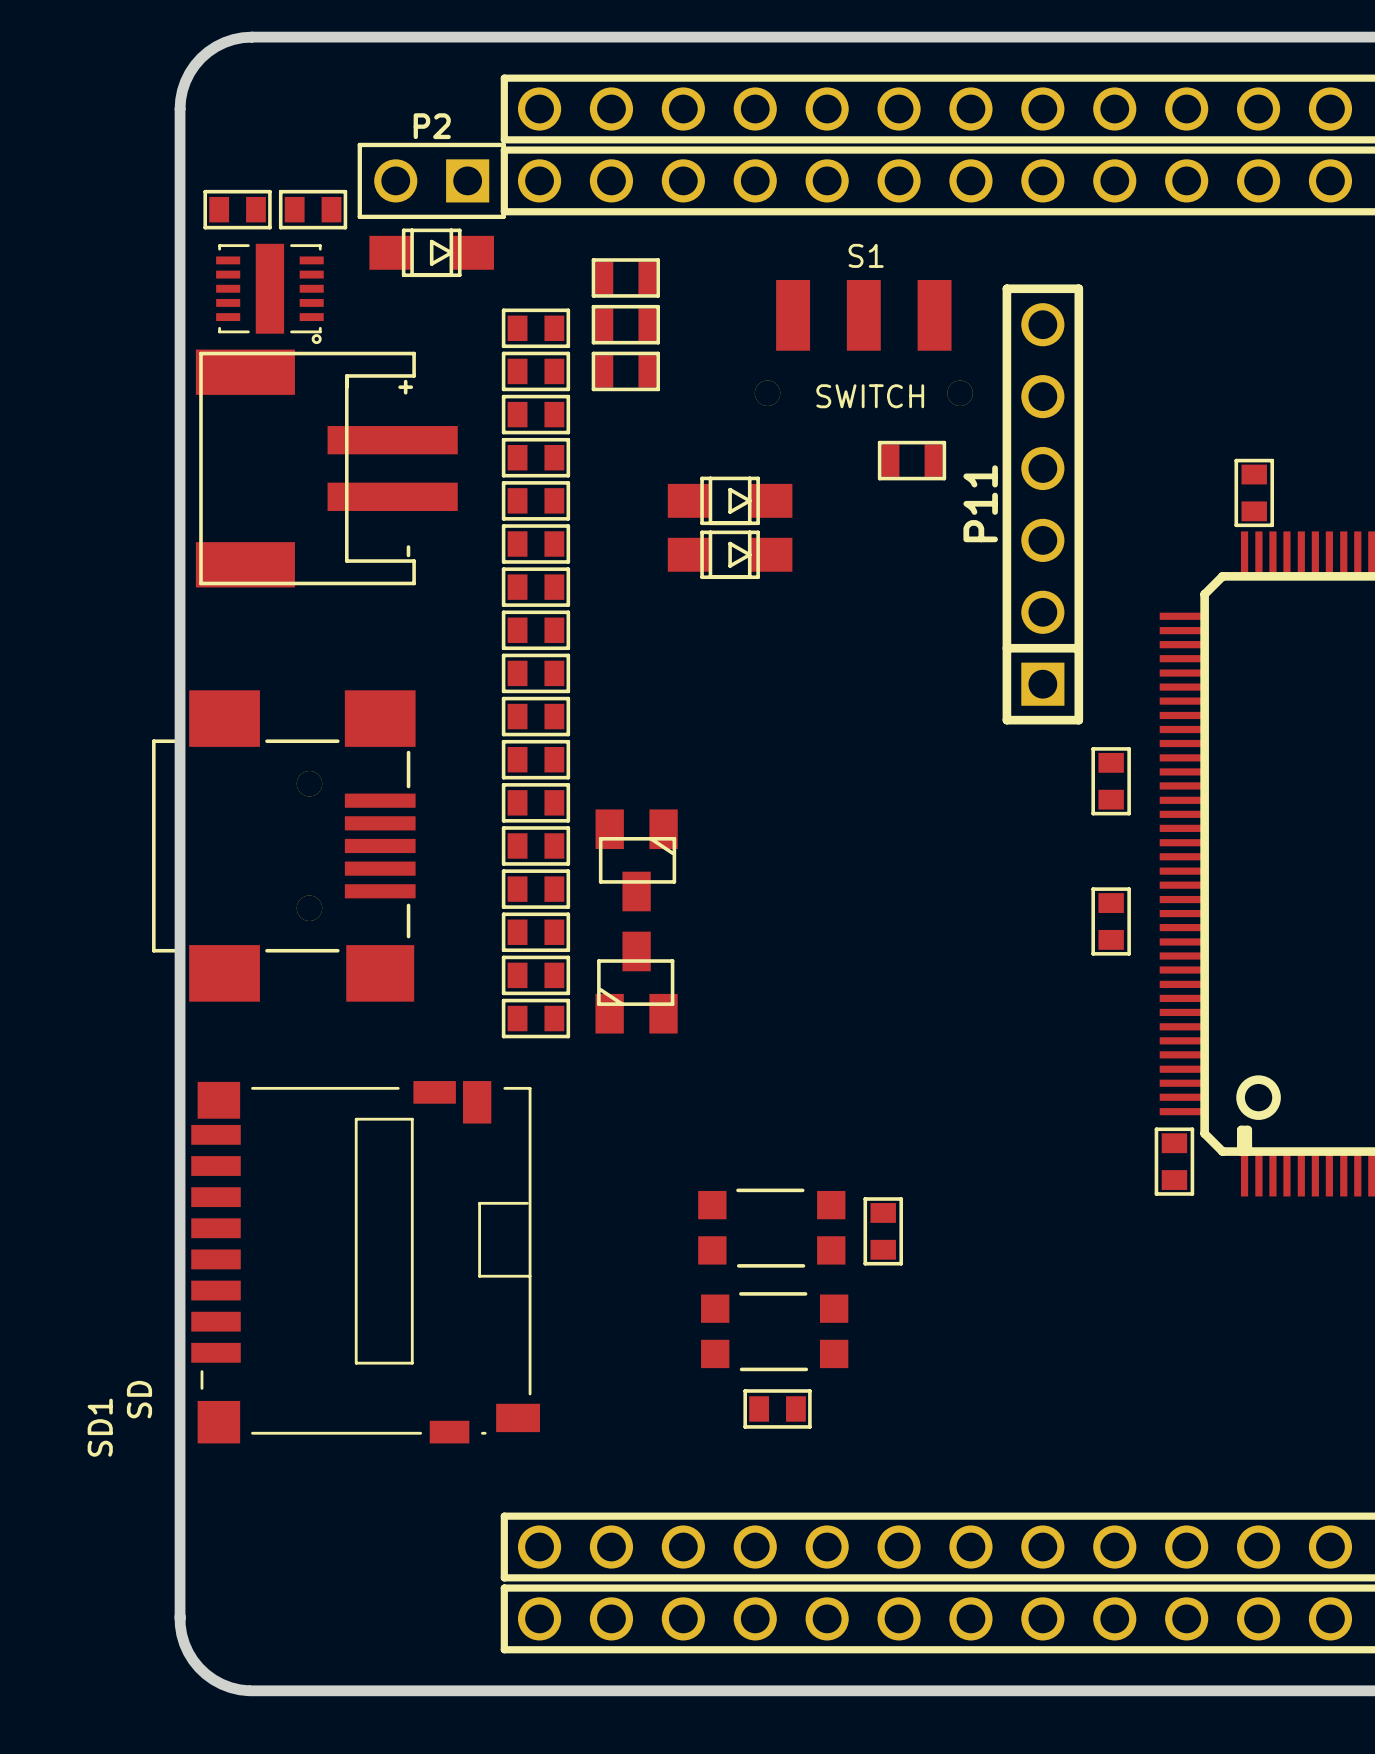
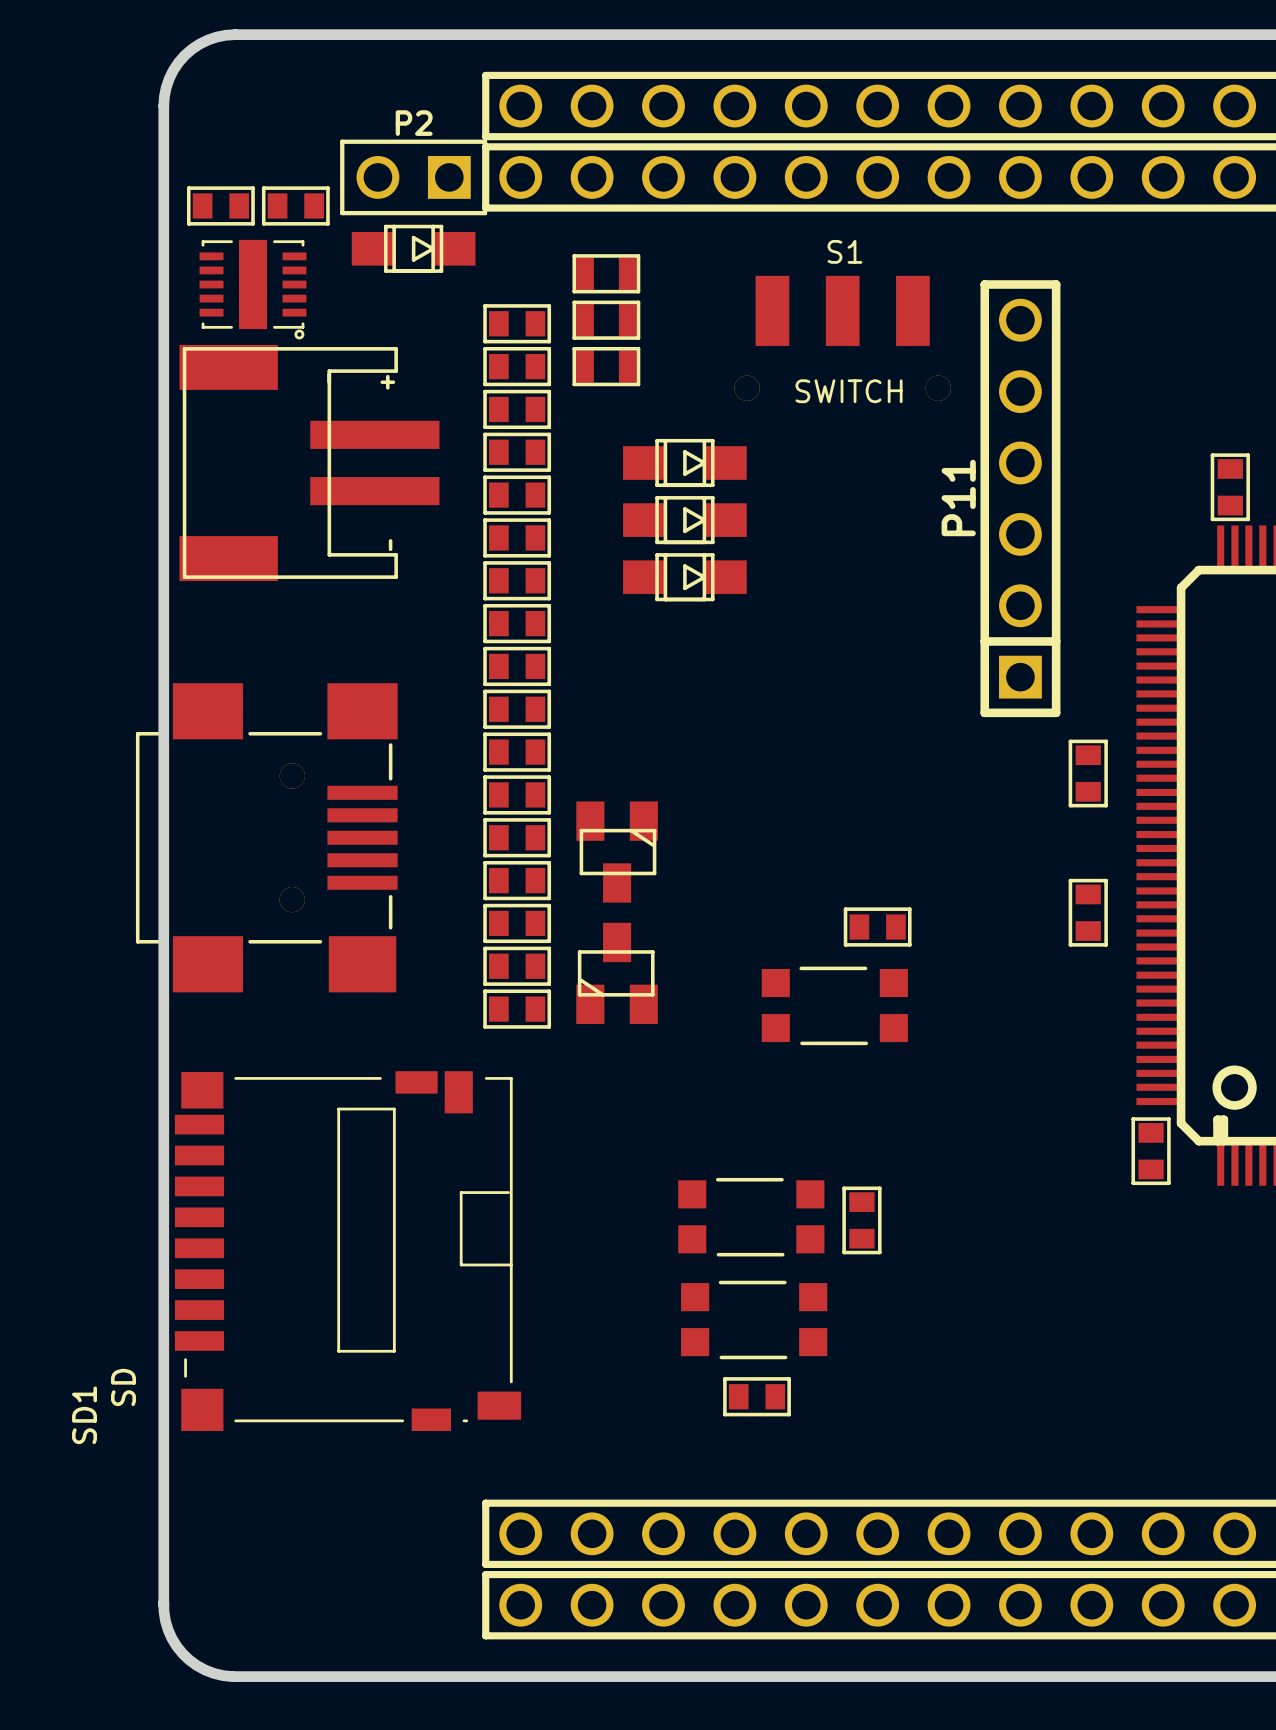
part: (912, 460) -> none
part: none -> (684, 462)
part: (730, 500) -> none
part: none -> (684, 520)
part: (730, 554) -> none
part: none -> (684, 577)
part: none -> (877, 927)
part: none -> (834, 1005)

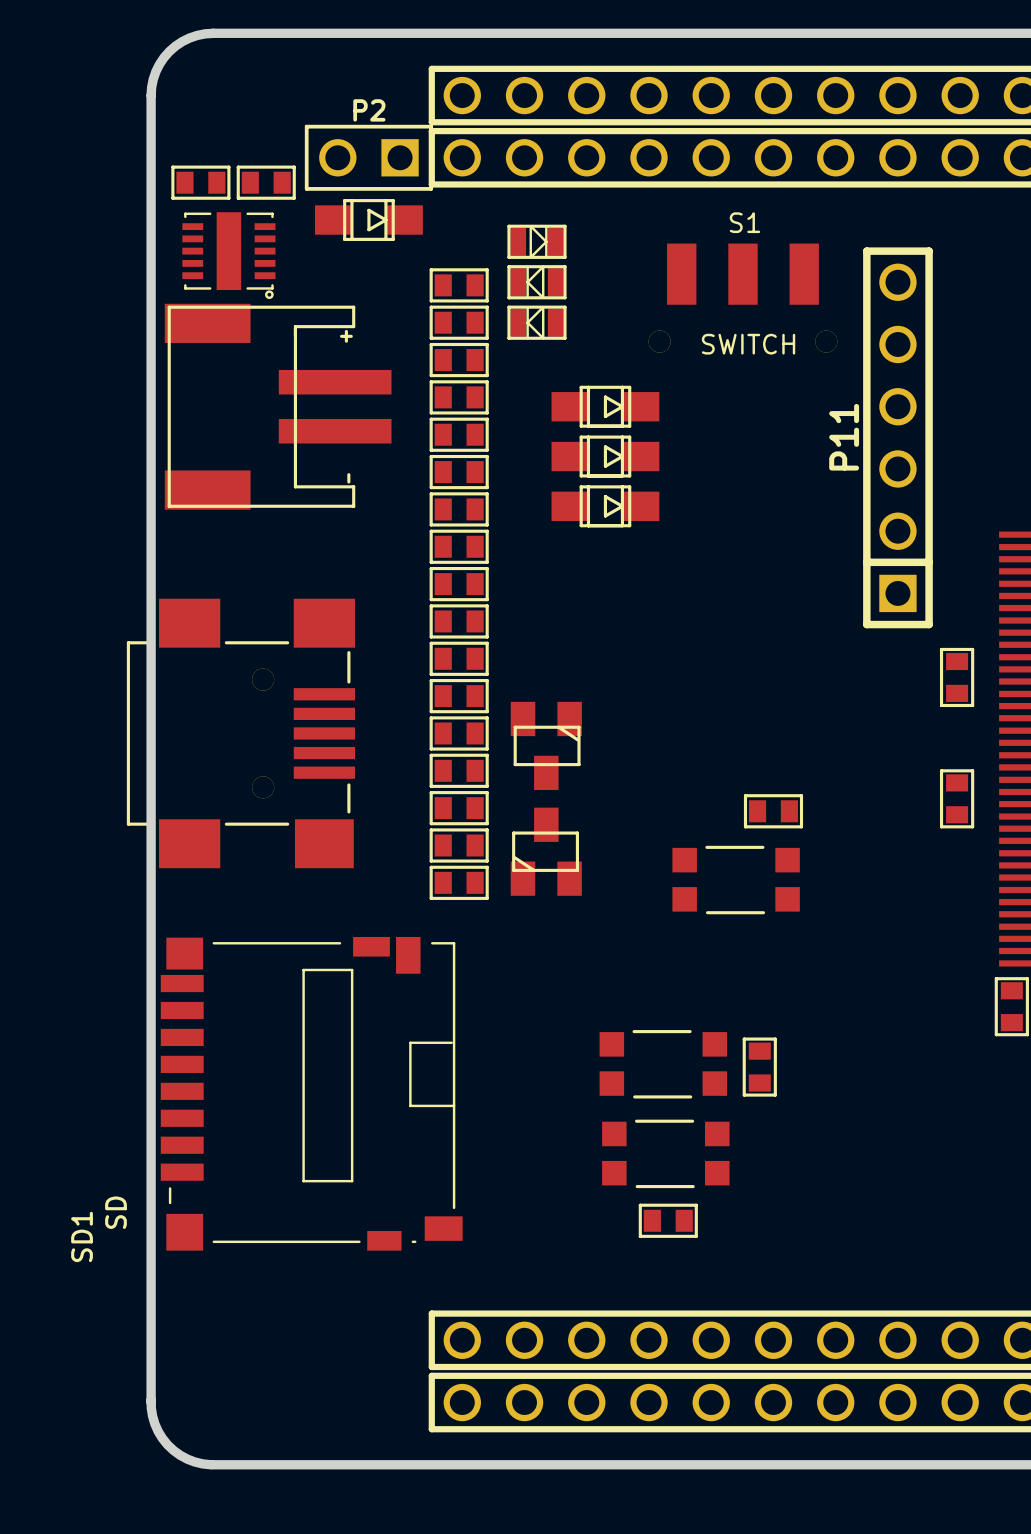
part footprint: [572, 254, 641, 294] -> [507, 224, 567, 259]
part footprint: [572, 300, 641, 340] -> [507, 265, 567, 300]
part footprint: [572, 346, 641, 387] -> [507, 305, 567, 340]

